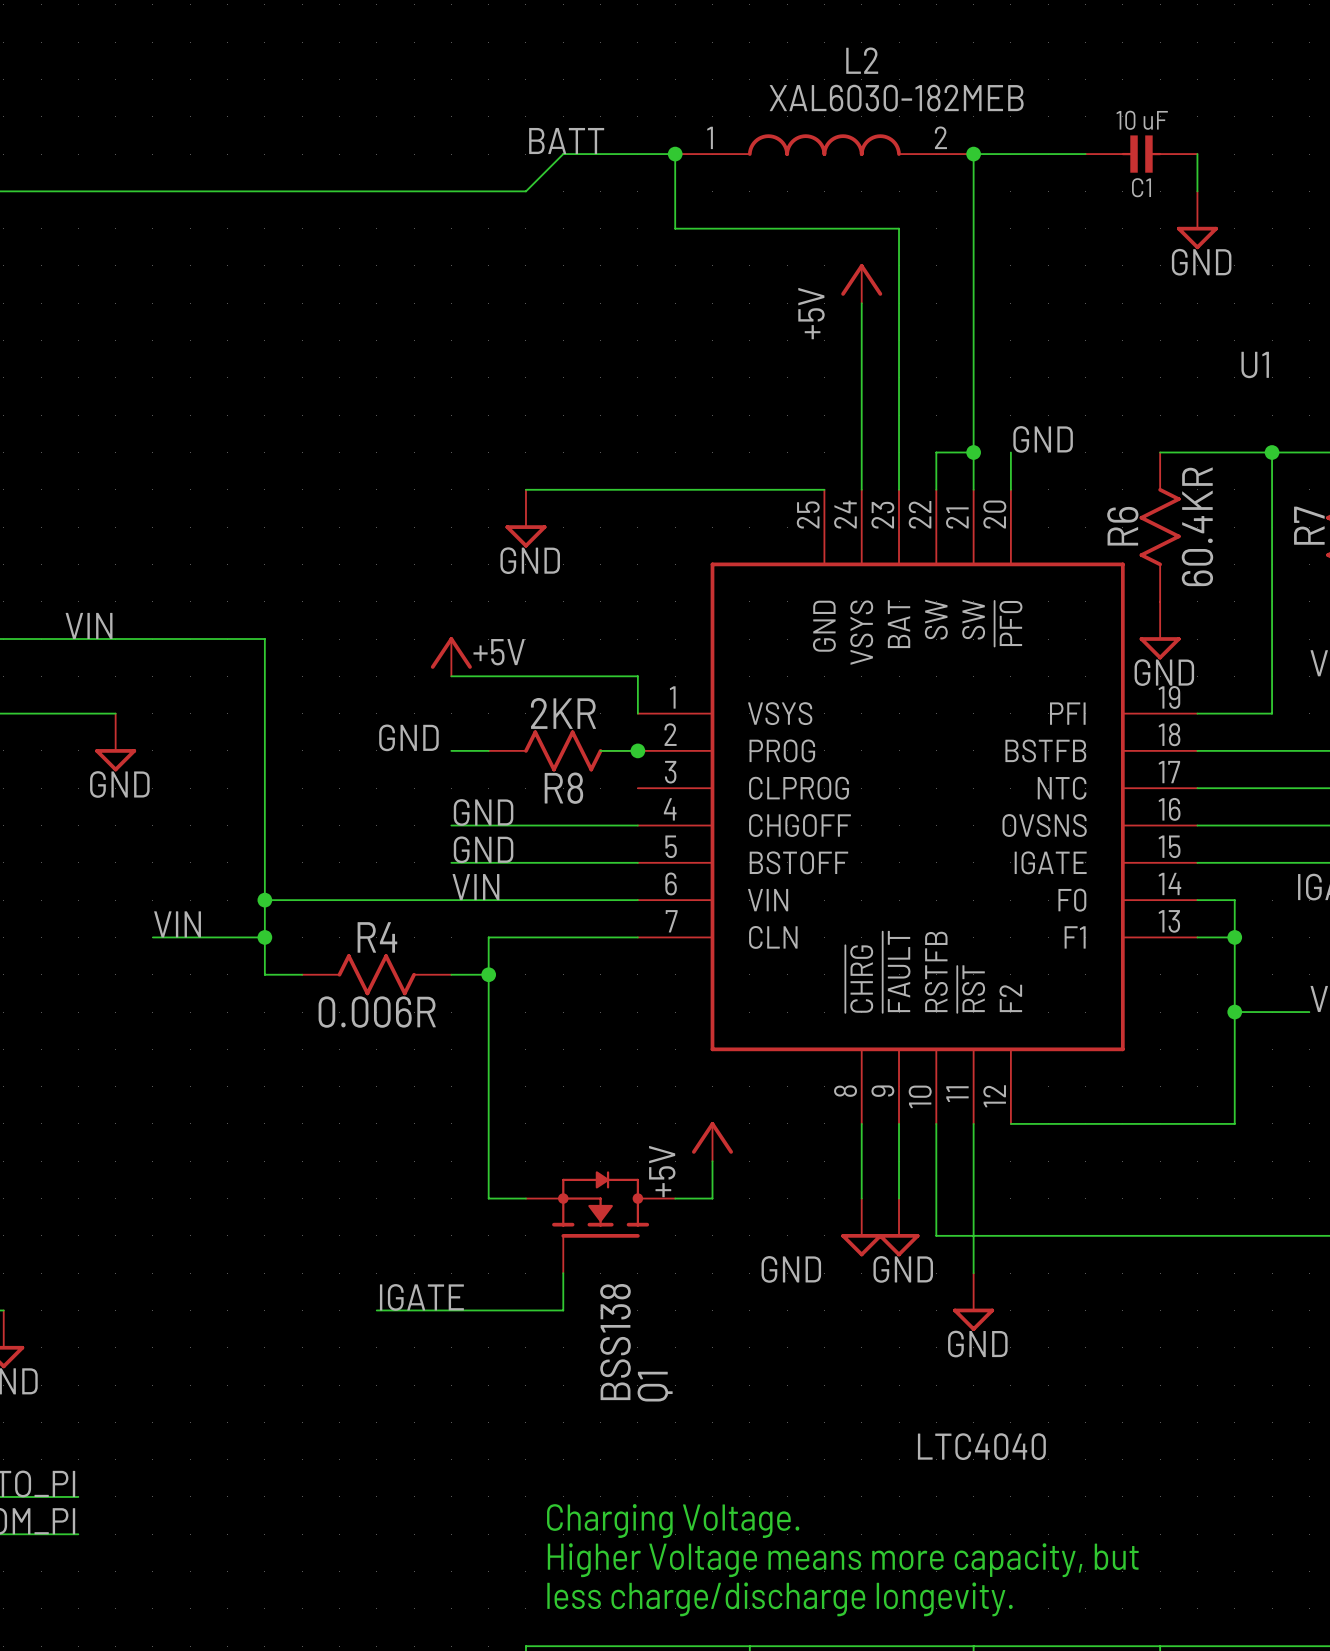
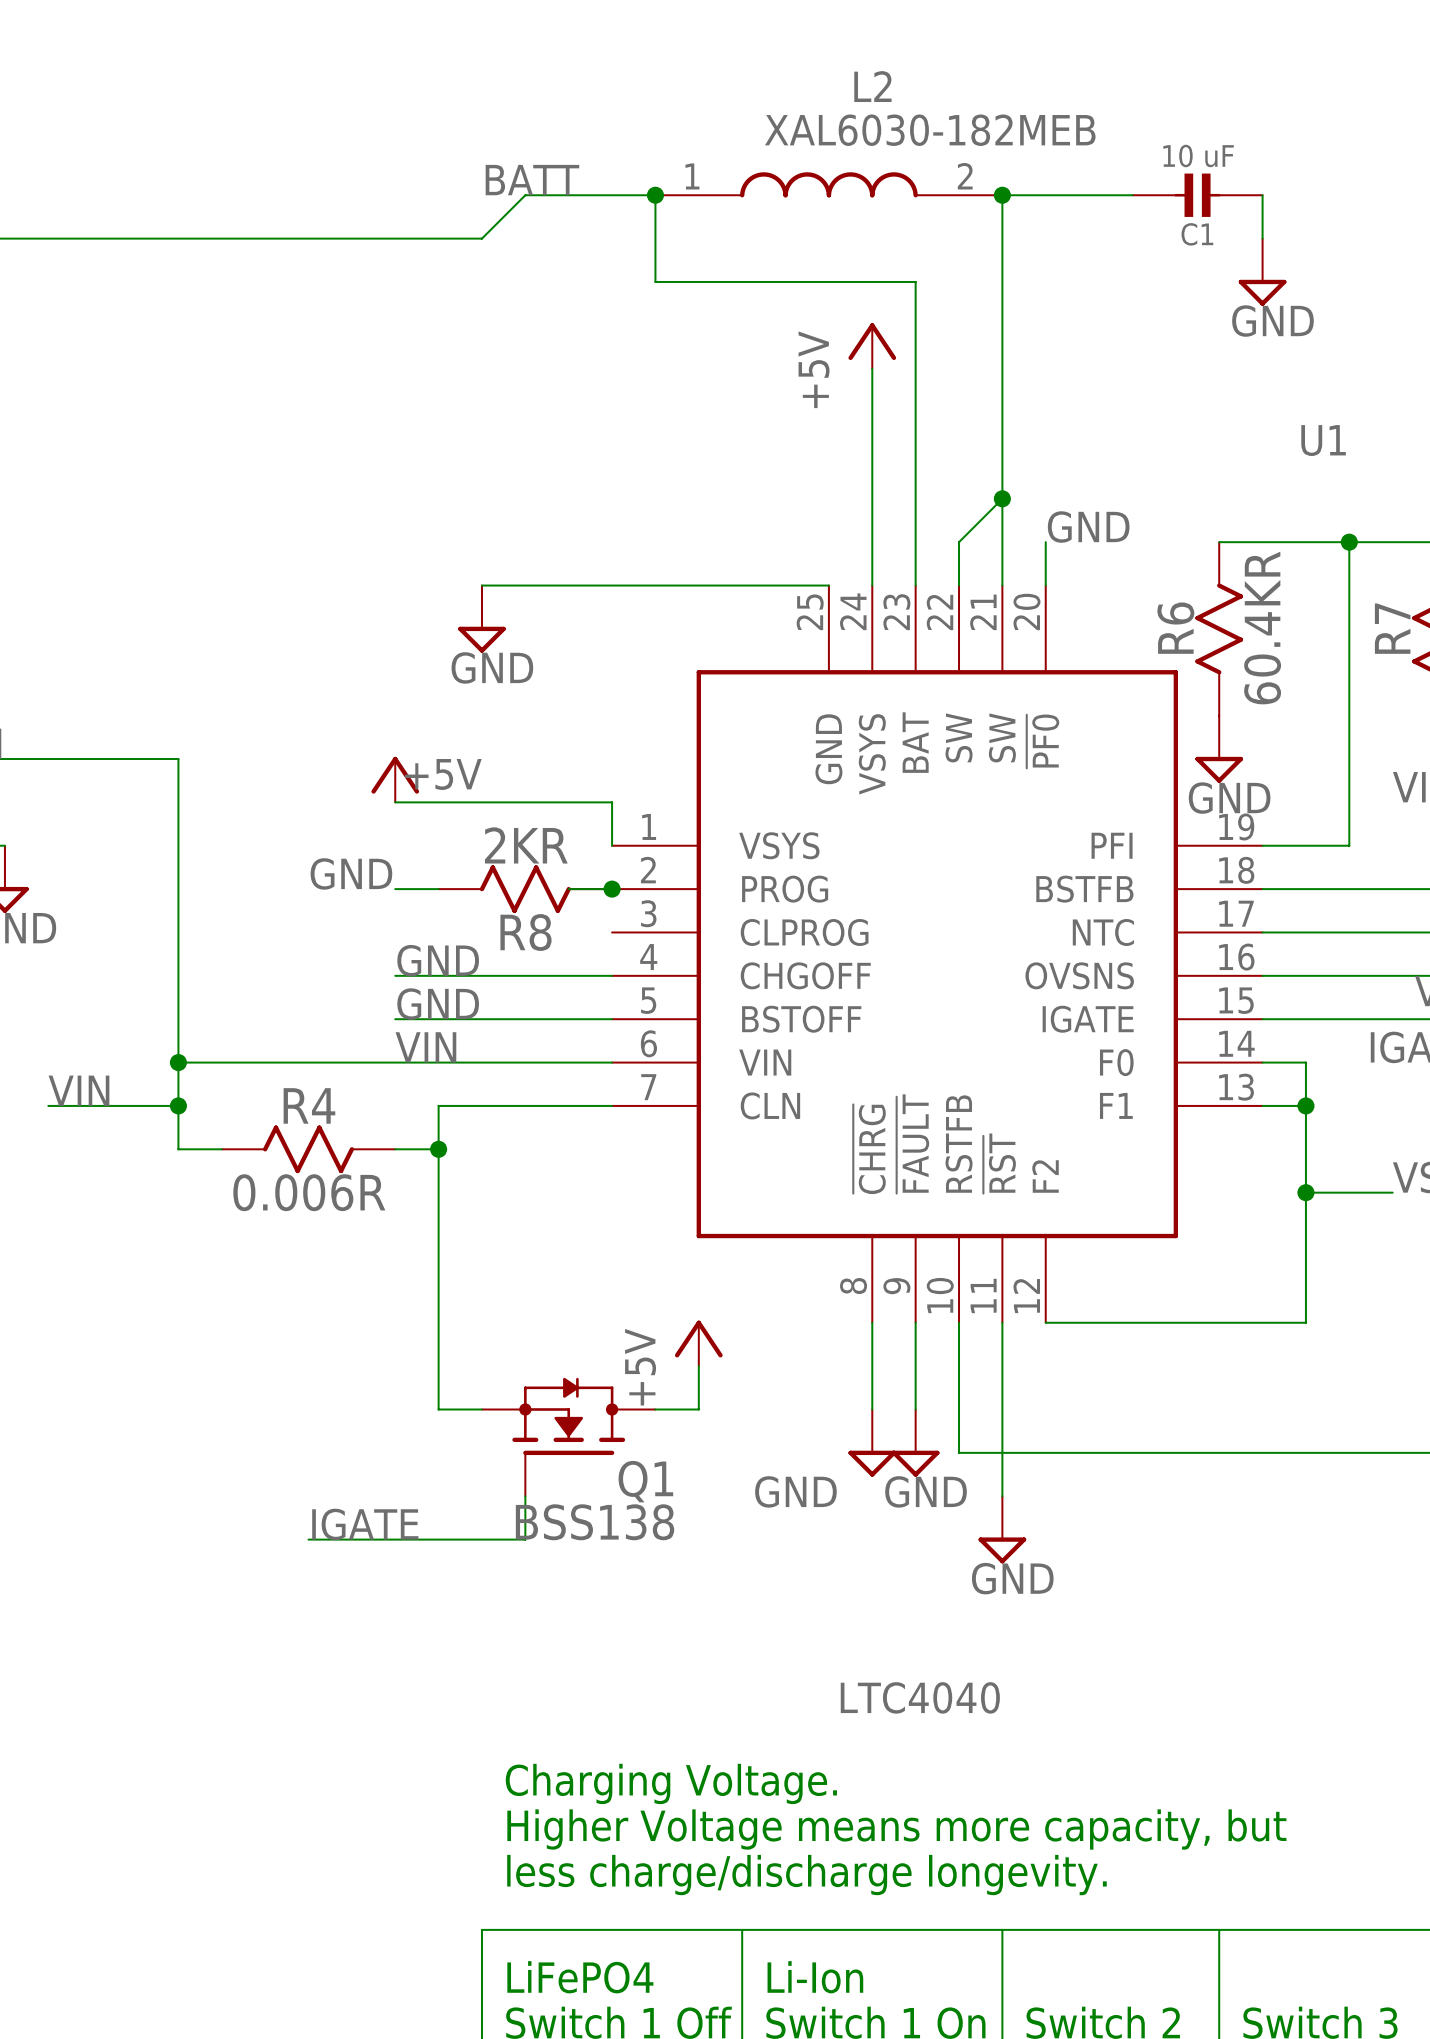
wire: (936, 452) (973, 452) -> (959, 542) (1002, 498)
junction position: (973, 452) -> (1002, 498)
Q1 value rotation: 0° (615, 1342) -> 90° clockwise (595, 1522)
Q1 name rotation: 0° (655, 1386) -> 90° clockwise (645, 1481)
Q1 name position: Q1 (655, 1386) -> Q1 (645, 1481)
U1 value position: LTC4040 (981, 1446) -> LTC4040 (920, 1697)

